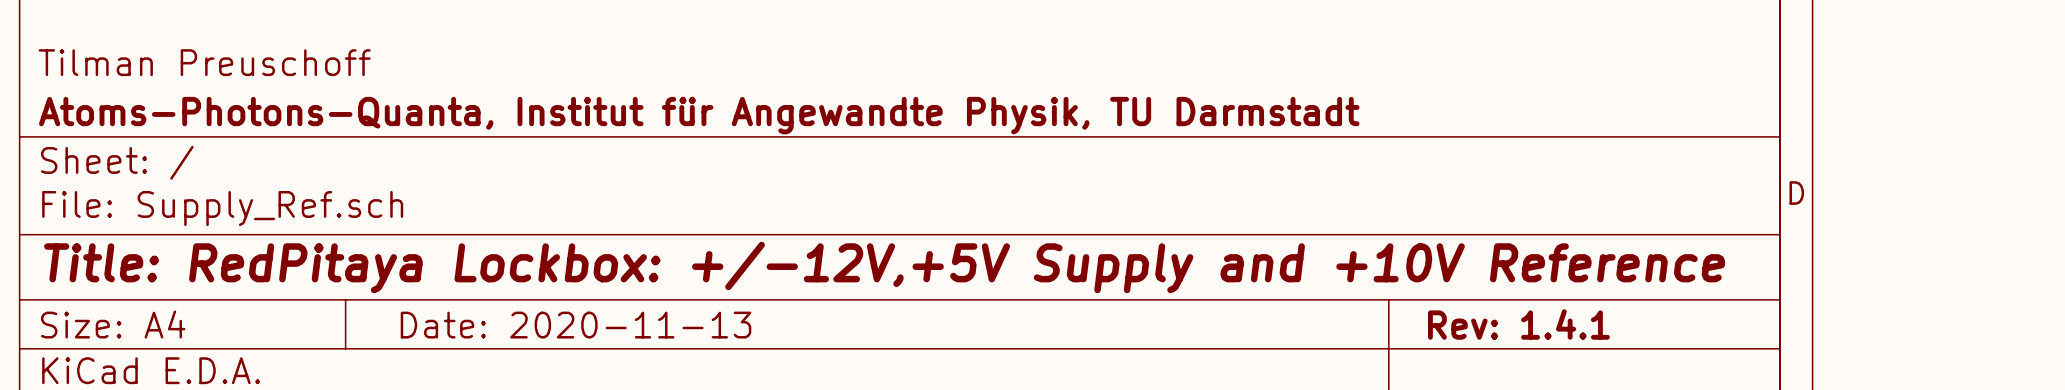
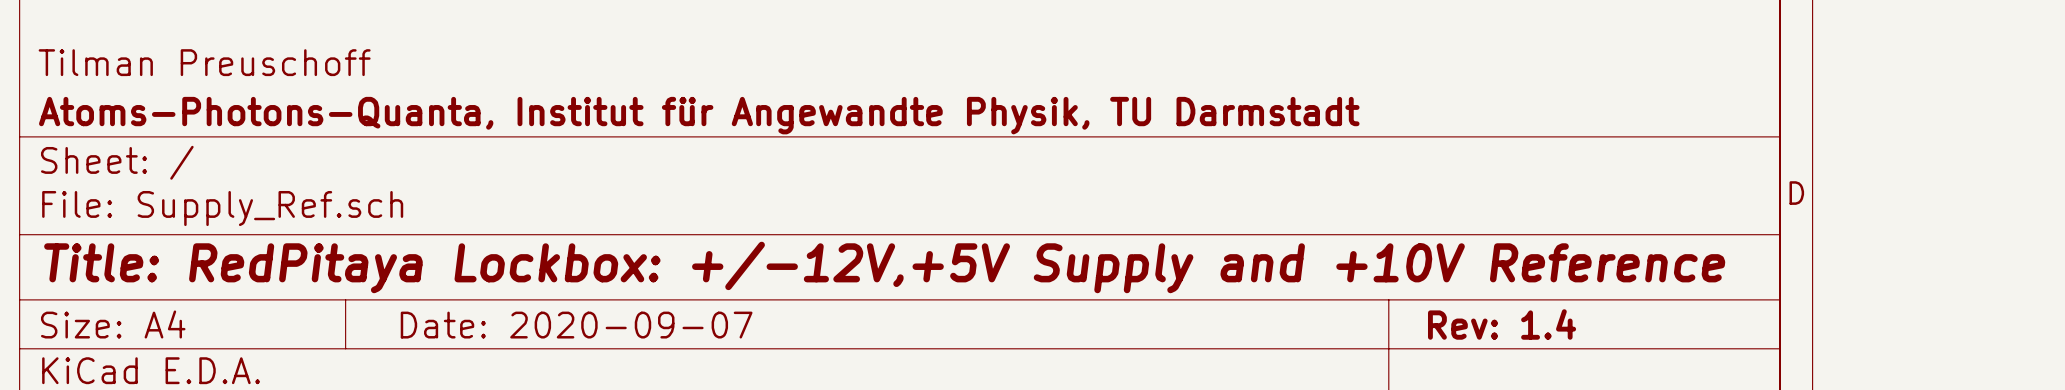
title block: Rev: 1.4.1 (1518, 324) -> Rev: 1.4 (1502, 324)
title block: Date: 2020-11-13 (576, 325) -> Date: 2020-09-07 (576, 325)

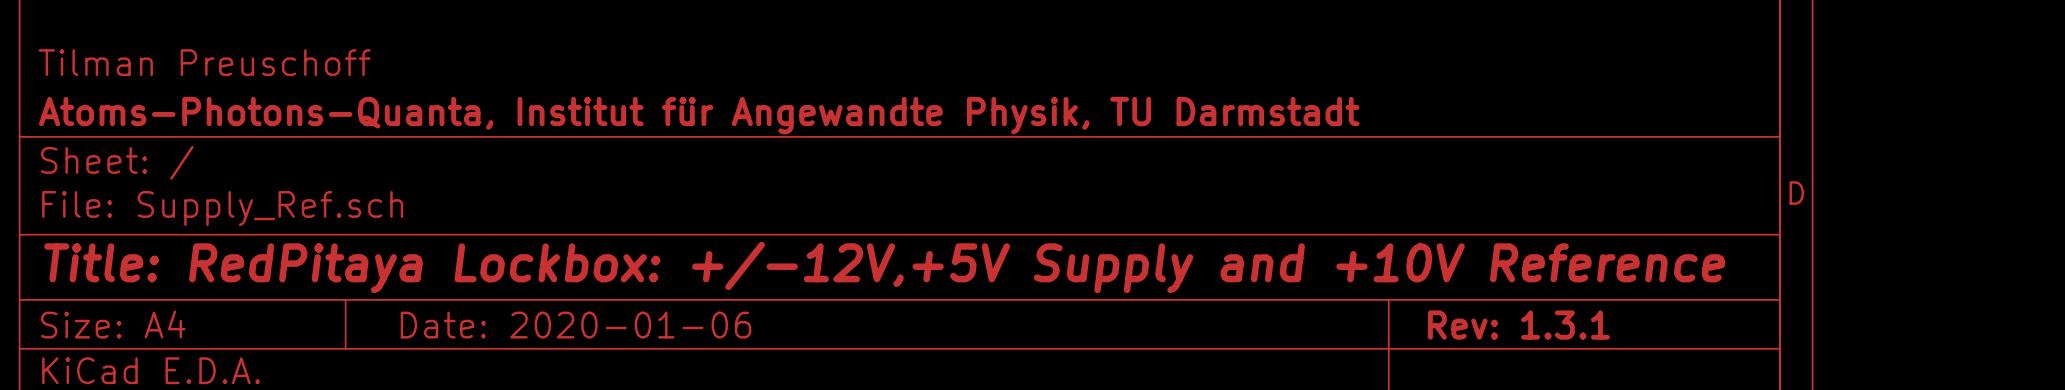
title block: Rev: 1.4 (1502, 324) -> Rev: 1.3.1 (1518, 325)
title block: Date: 2020-09-07 (576, 325) -> Date: 2020-01-06 (576, 325)

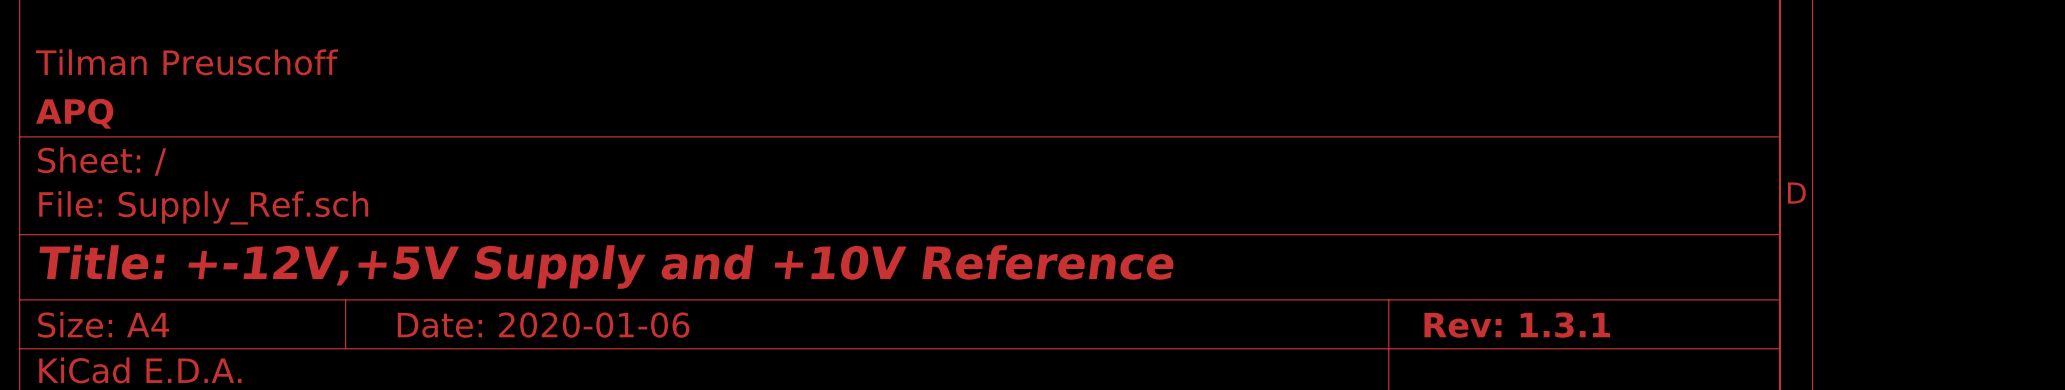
title block: Atoms-Photons-Quanta, Institut für Angewandte Physik, TU Darmstadt (699, 115) -> APQ (74, 113)
title block: Title: RedPitaya Lockbox: +/-12V,+5V Supply and +10V Reference (884, 267) -> Title: +-12V,+5V Supply and +10V Reference (606, 266)

